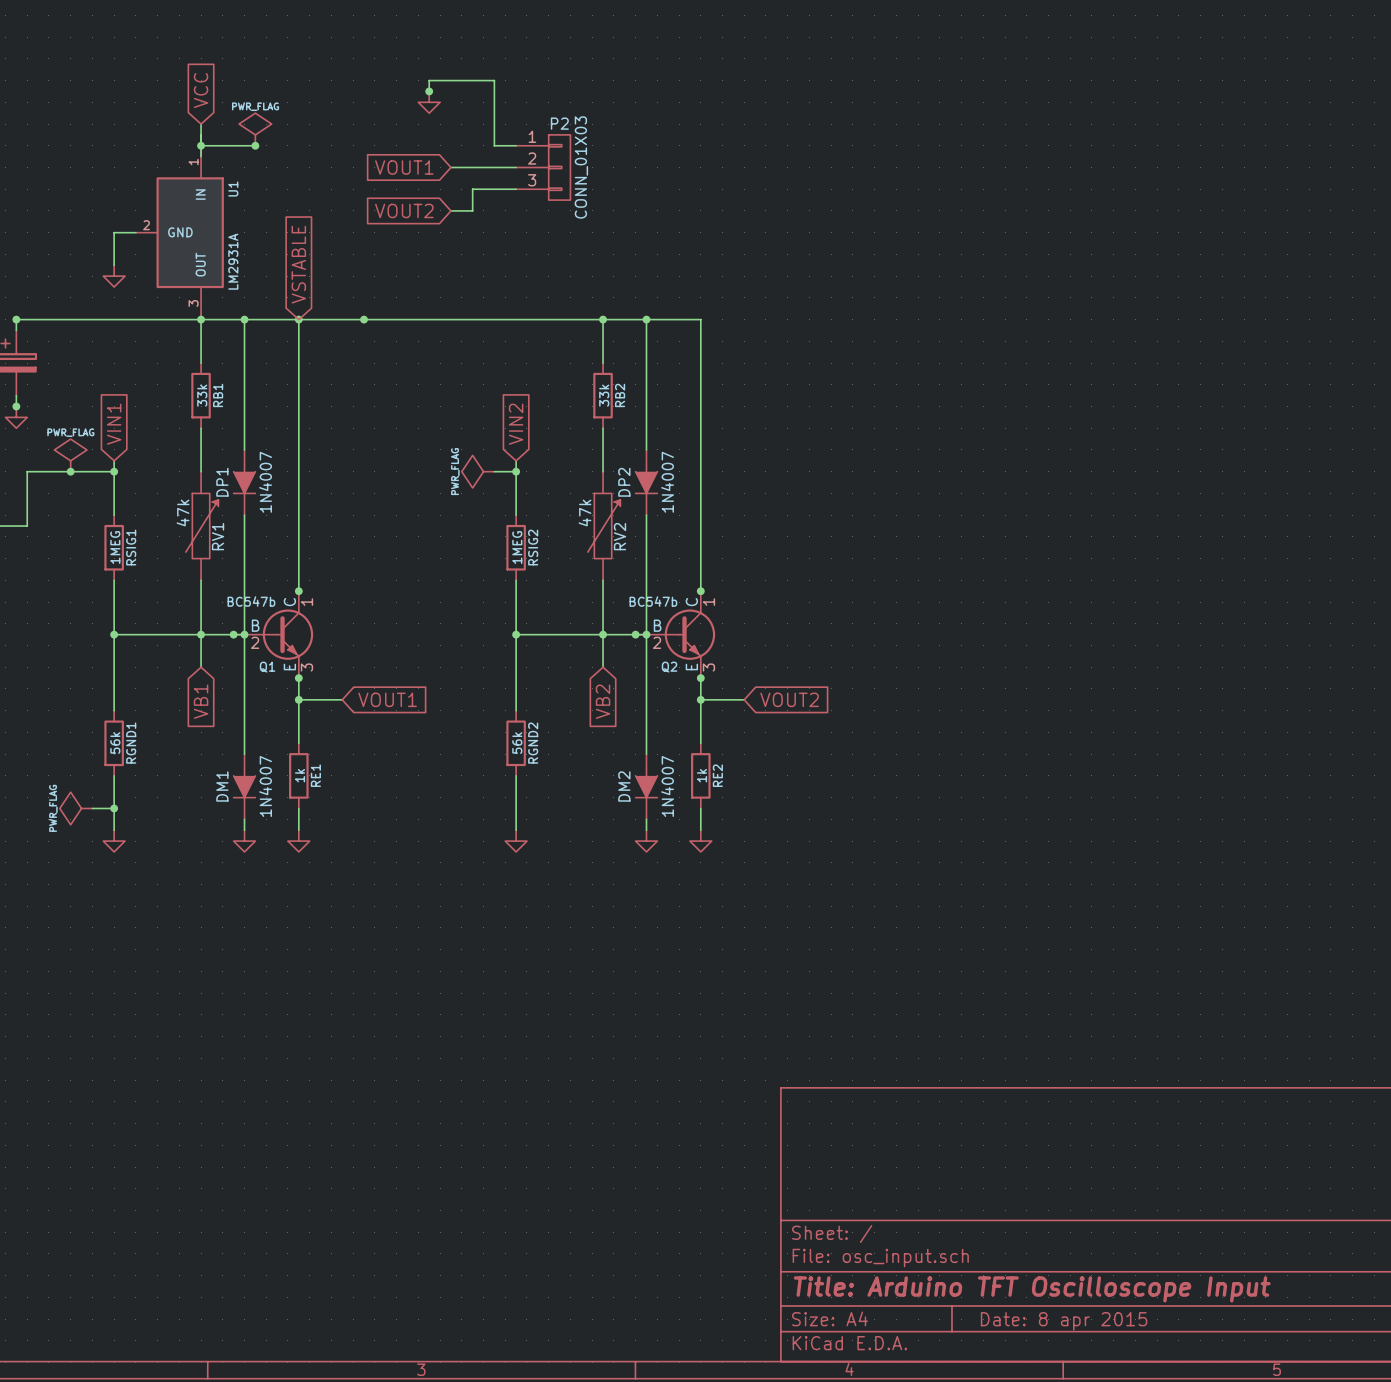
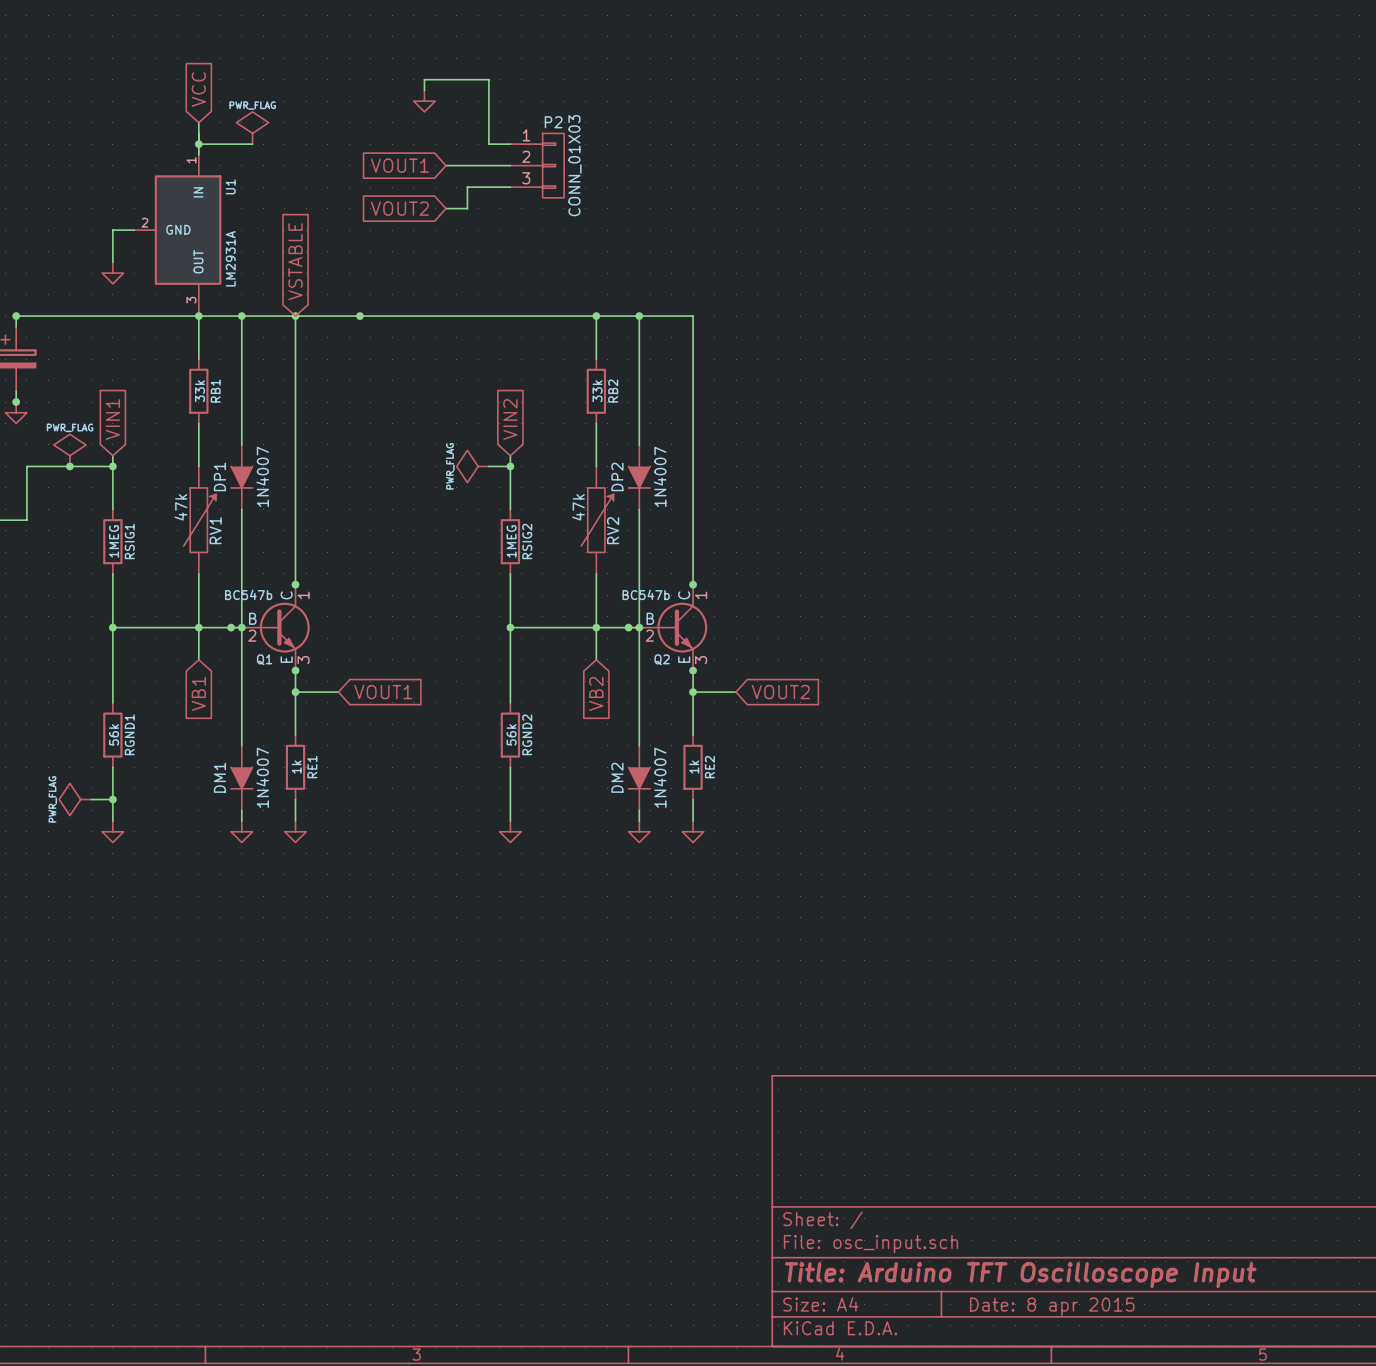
junction: (429, 91) -> none
junction: (255, 145) -> none

